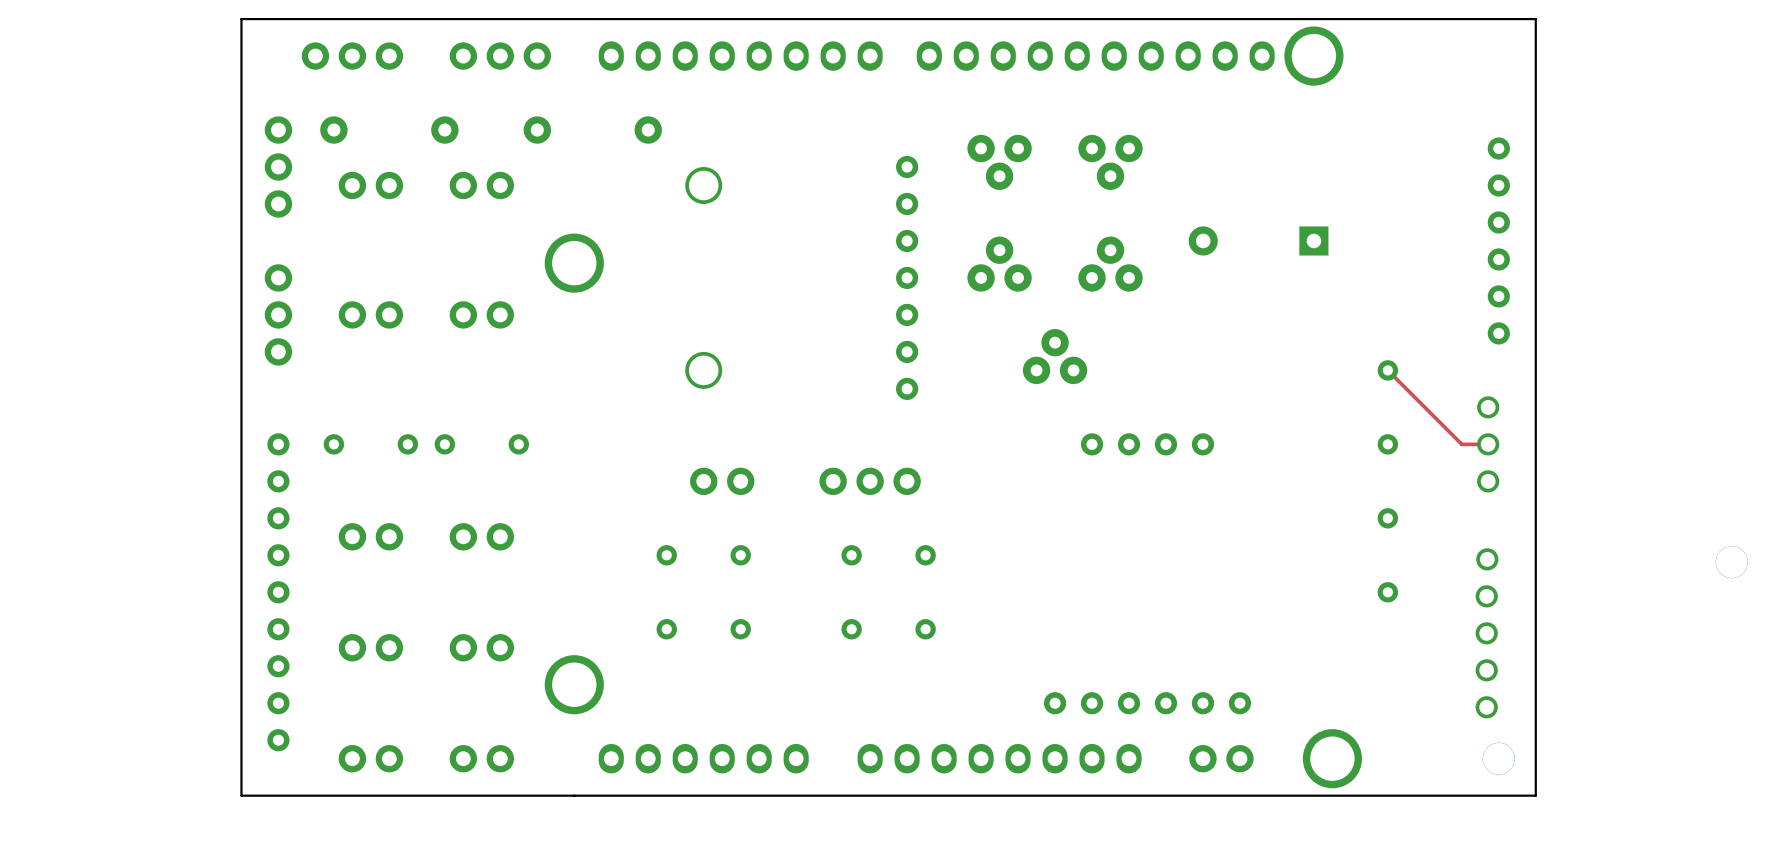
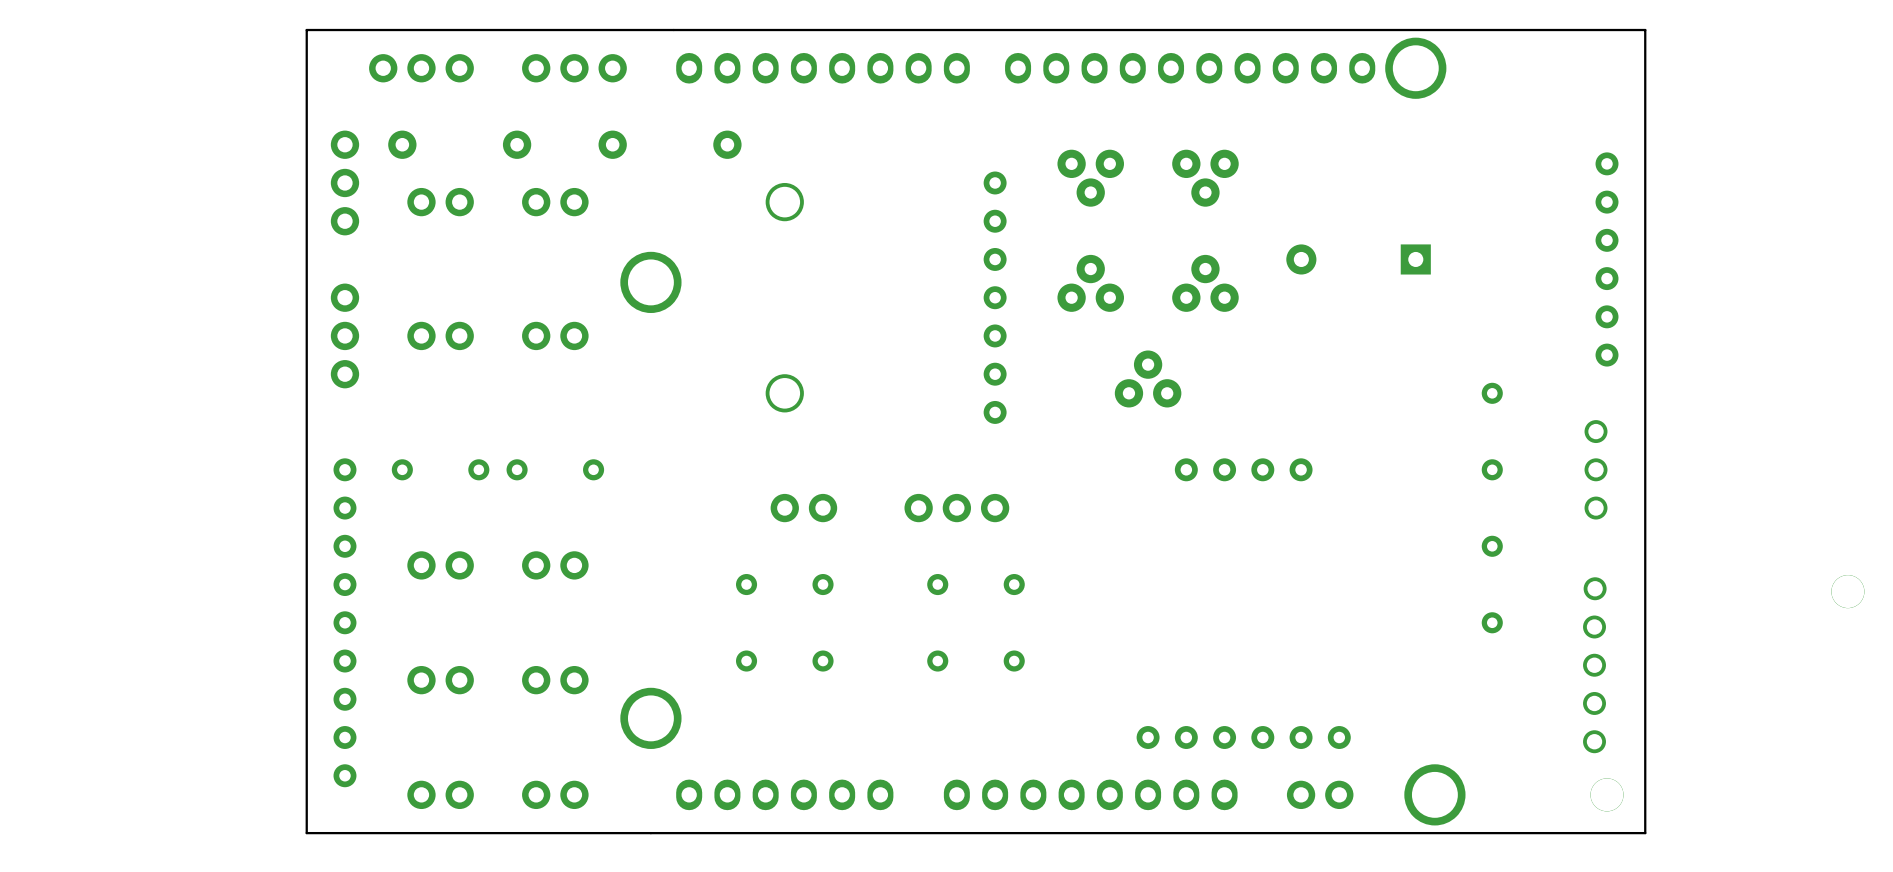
top track: (1387, 370) (1461, 444) (1488, 444) -> none

